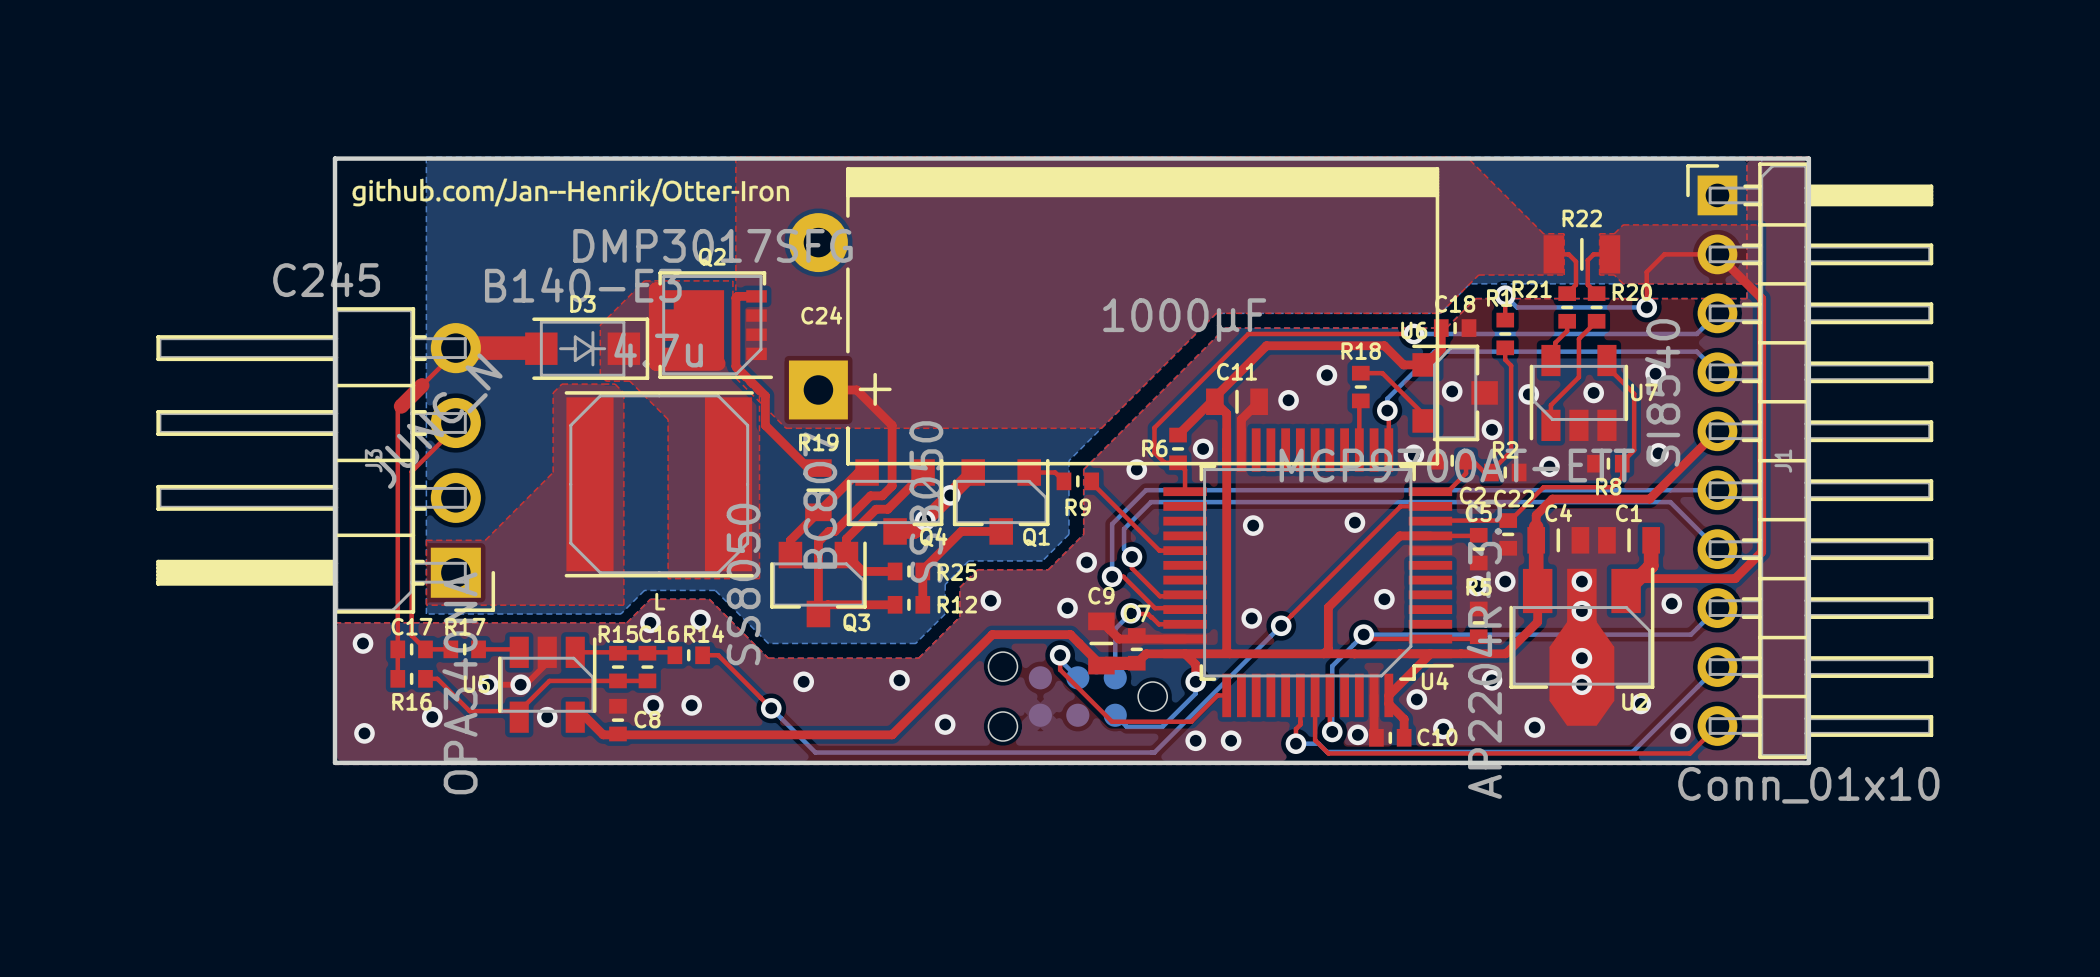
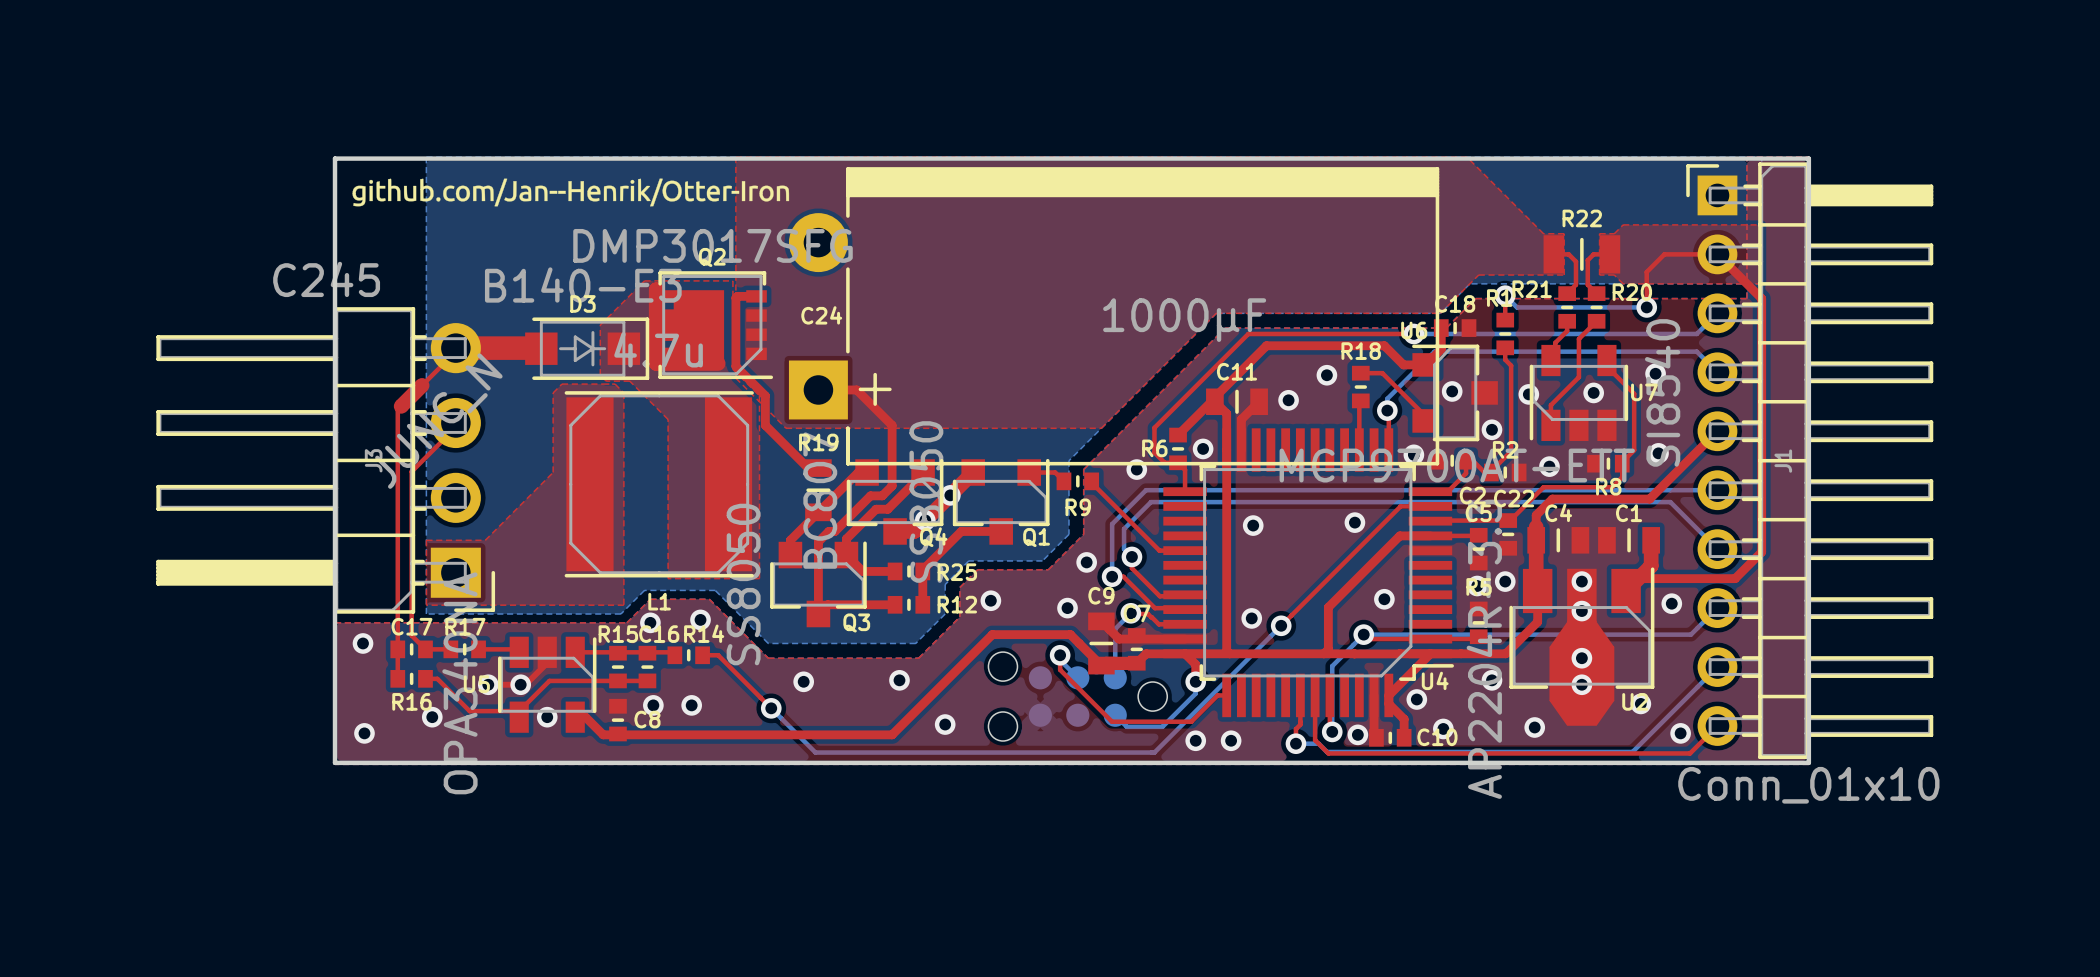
L name: L (660, 601) -> L1 (659, 601)

